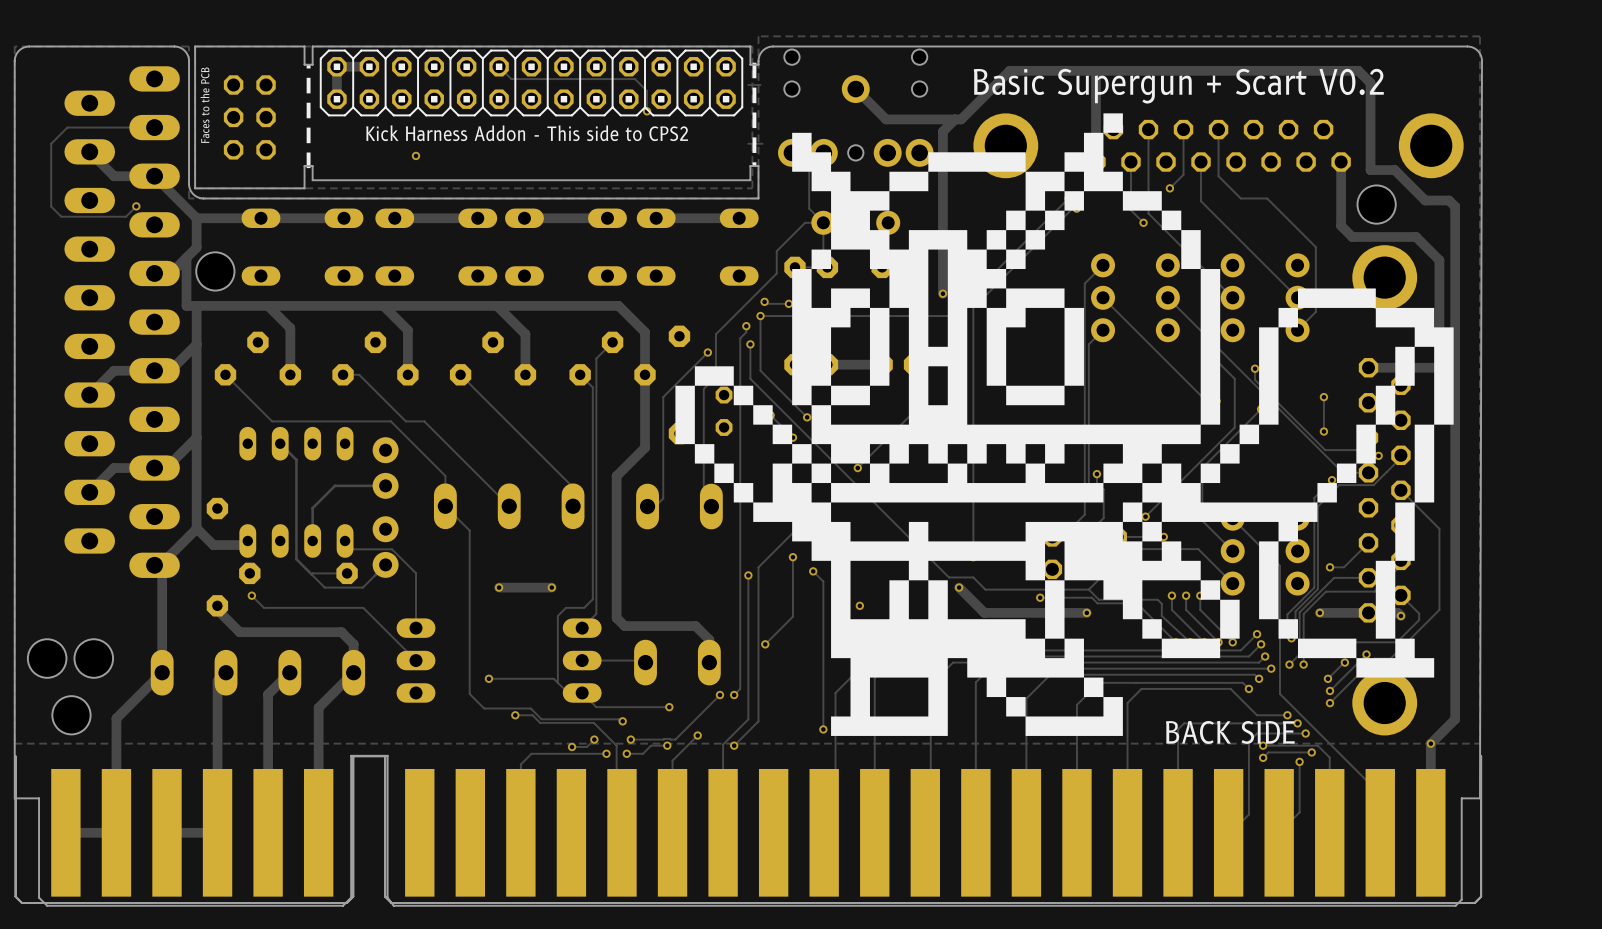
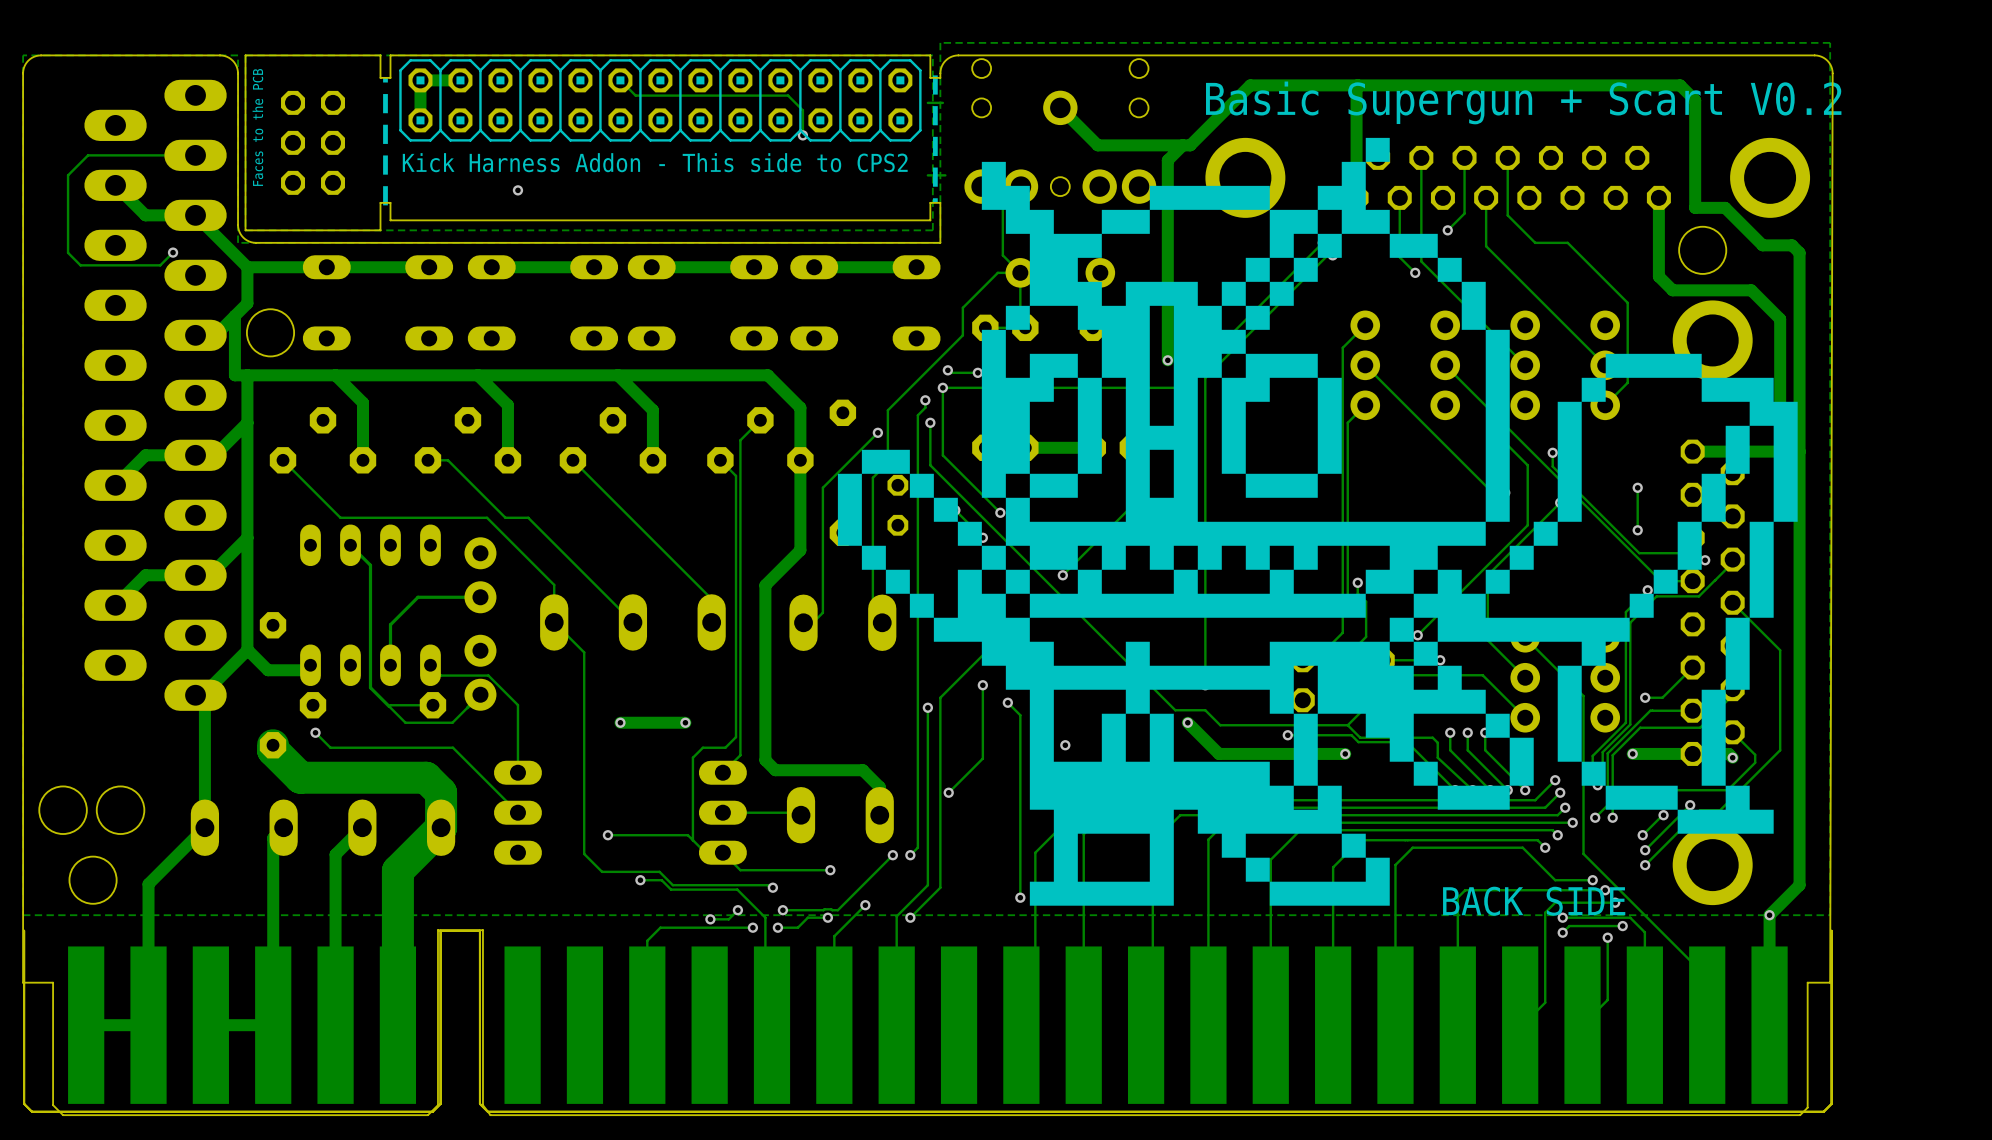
track width: thin (217, 605) (217, 609) (239, 632) (341, 632) (353, 644) (353, 672) (318, 707) (318, 832) -> thick (273, 745) (273, 750) (300, 777) (426, 777) (441, 792) (441, 827) (397, 870) (397, 1025)

